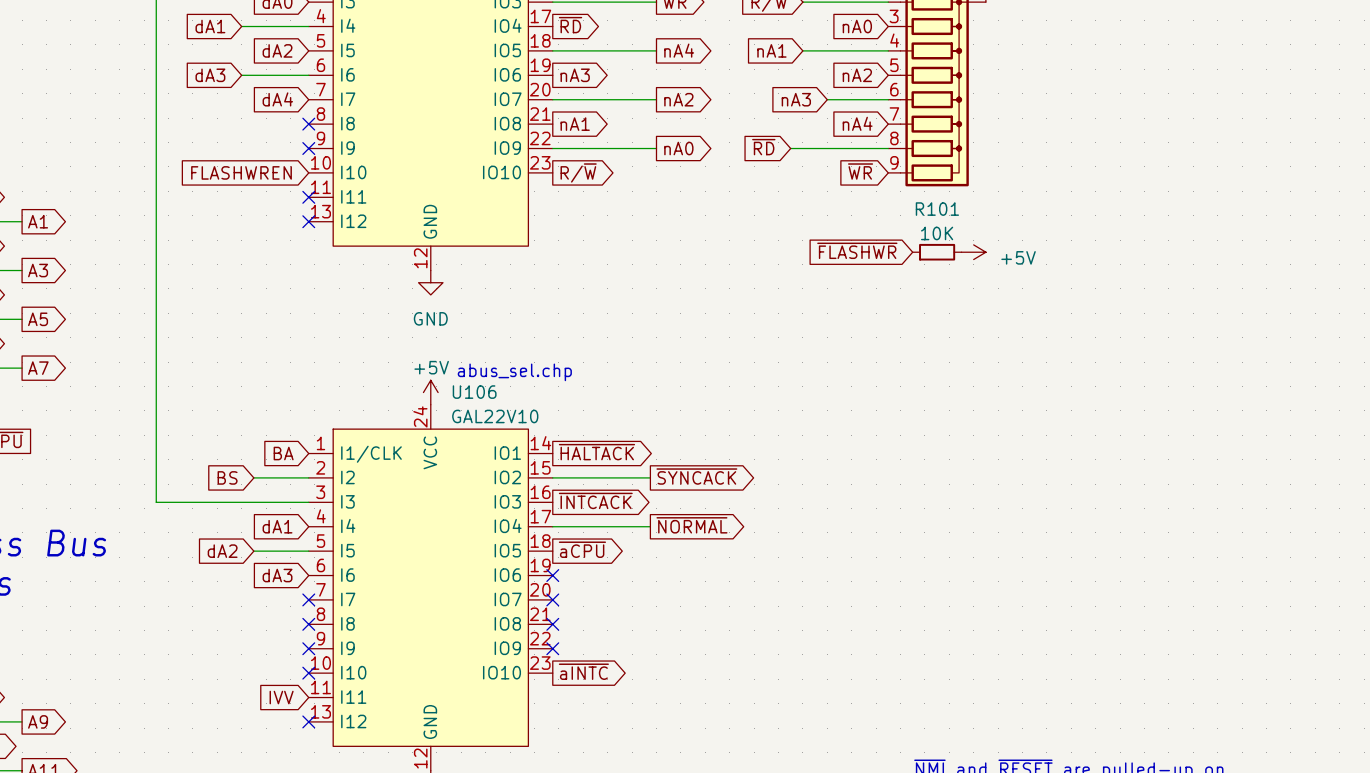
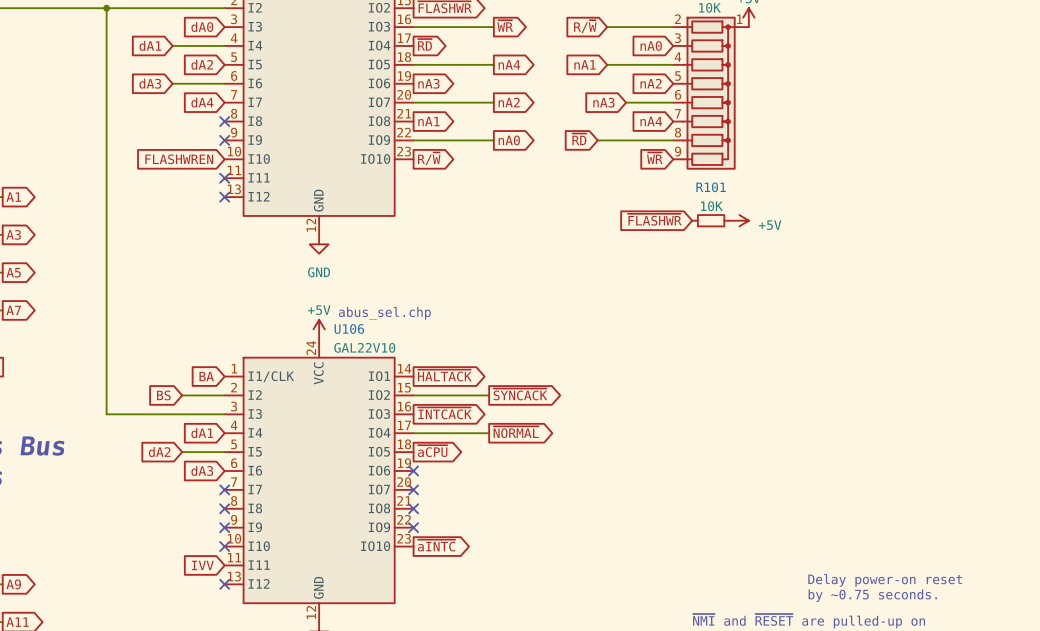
text: none -> Delay power-on reset (885, 580)
text: none -> by ~0.75 seconds. (872, 595)

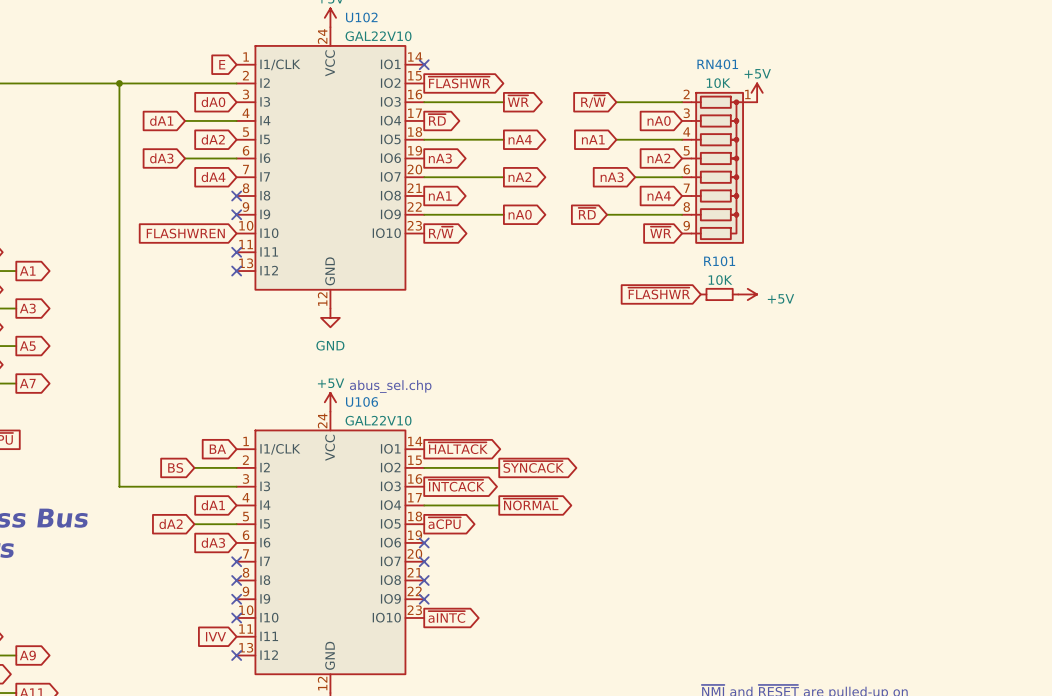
text: Delay power-on reset (885, 580) -> none
text: by ~0.75 seconds. (872, 595) -> none

